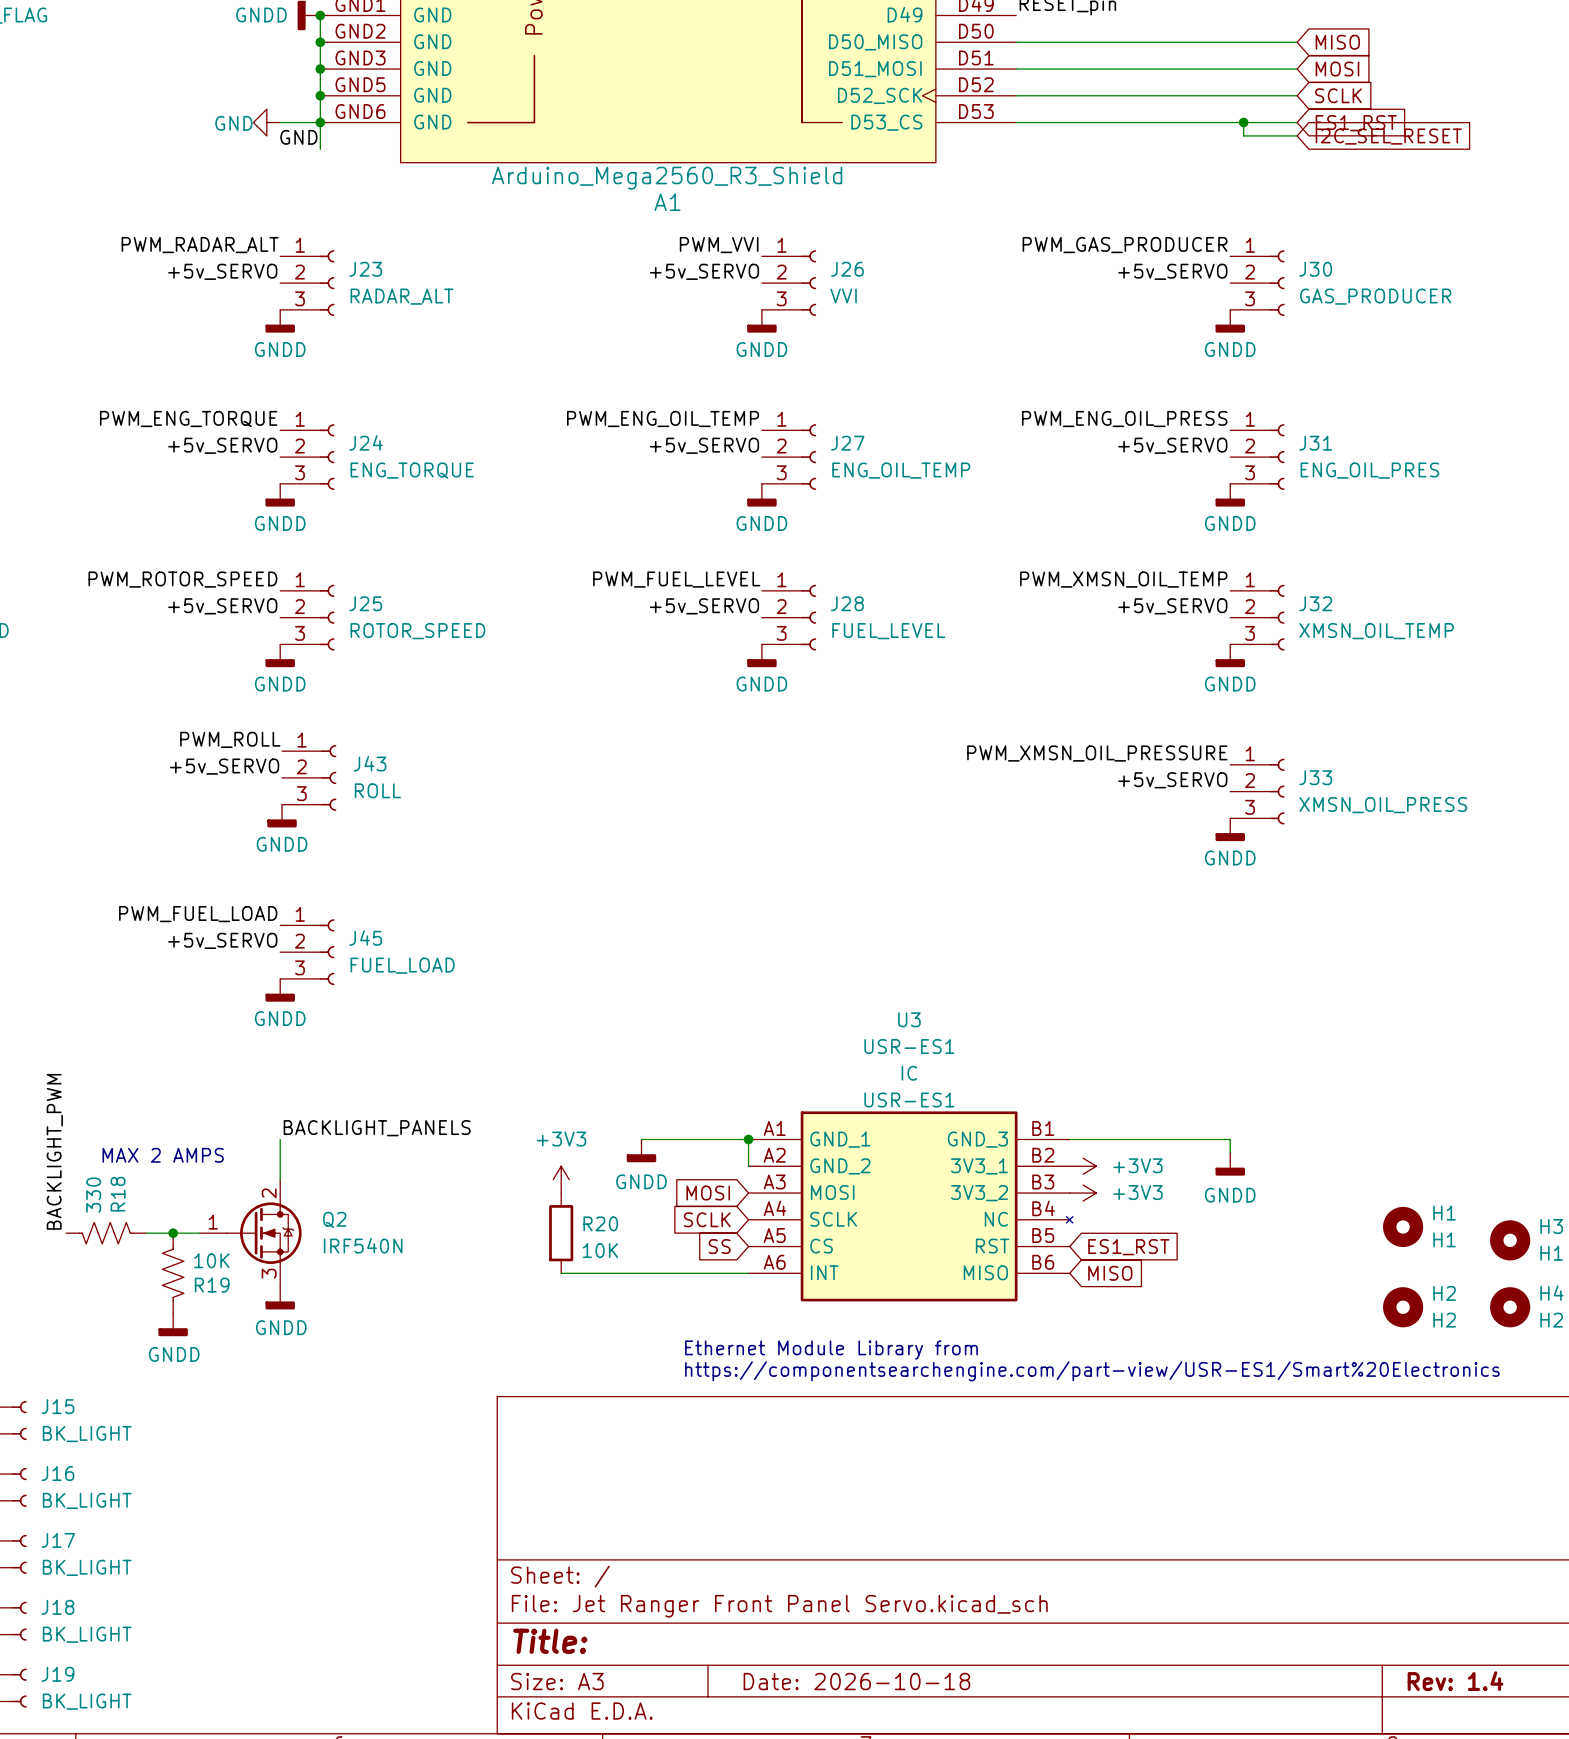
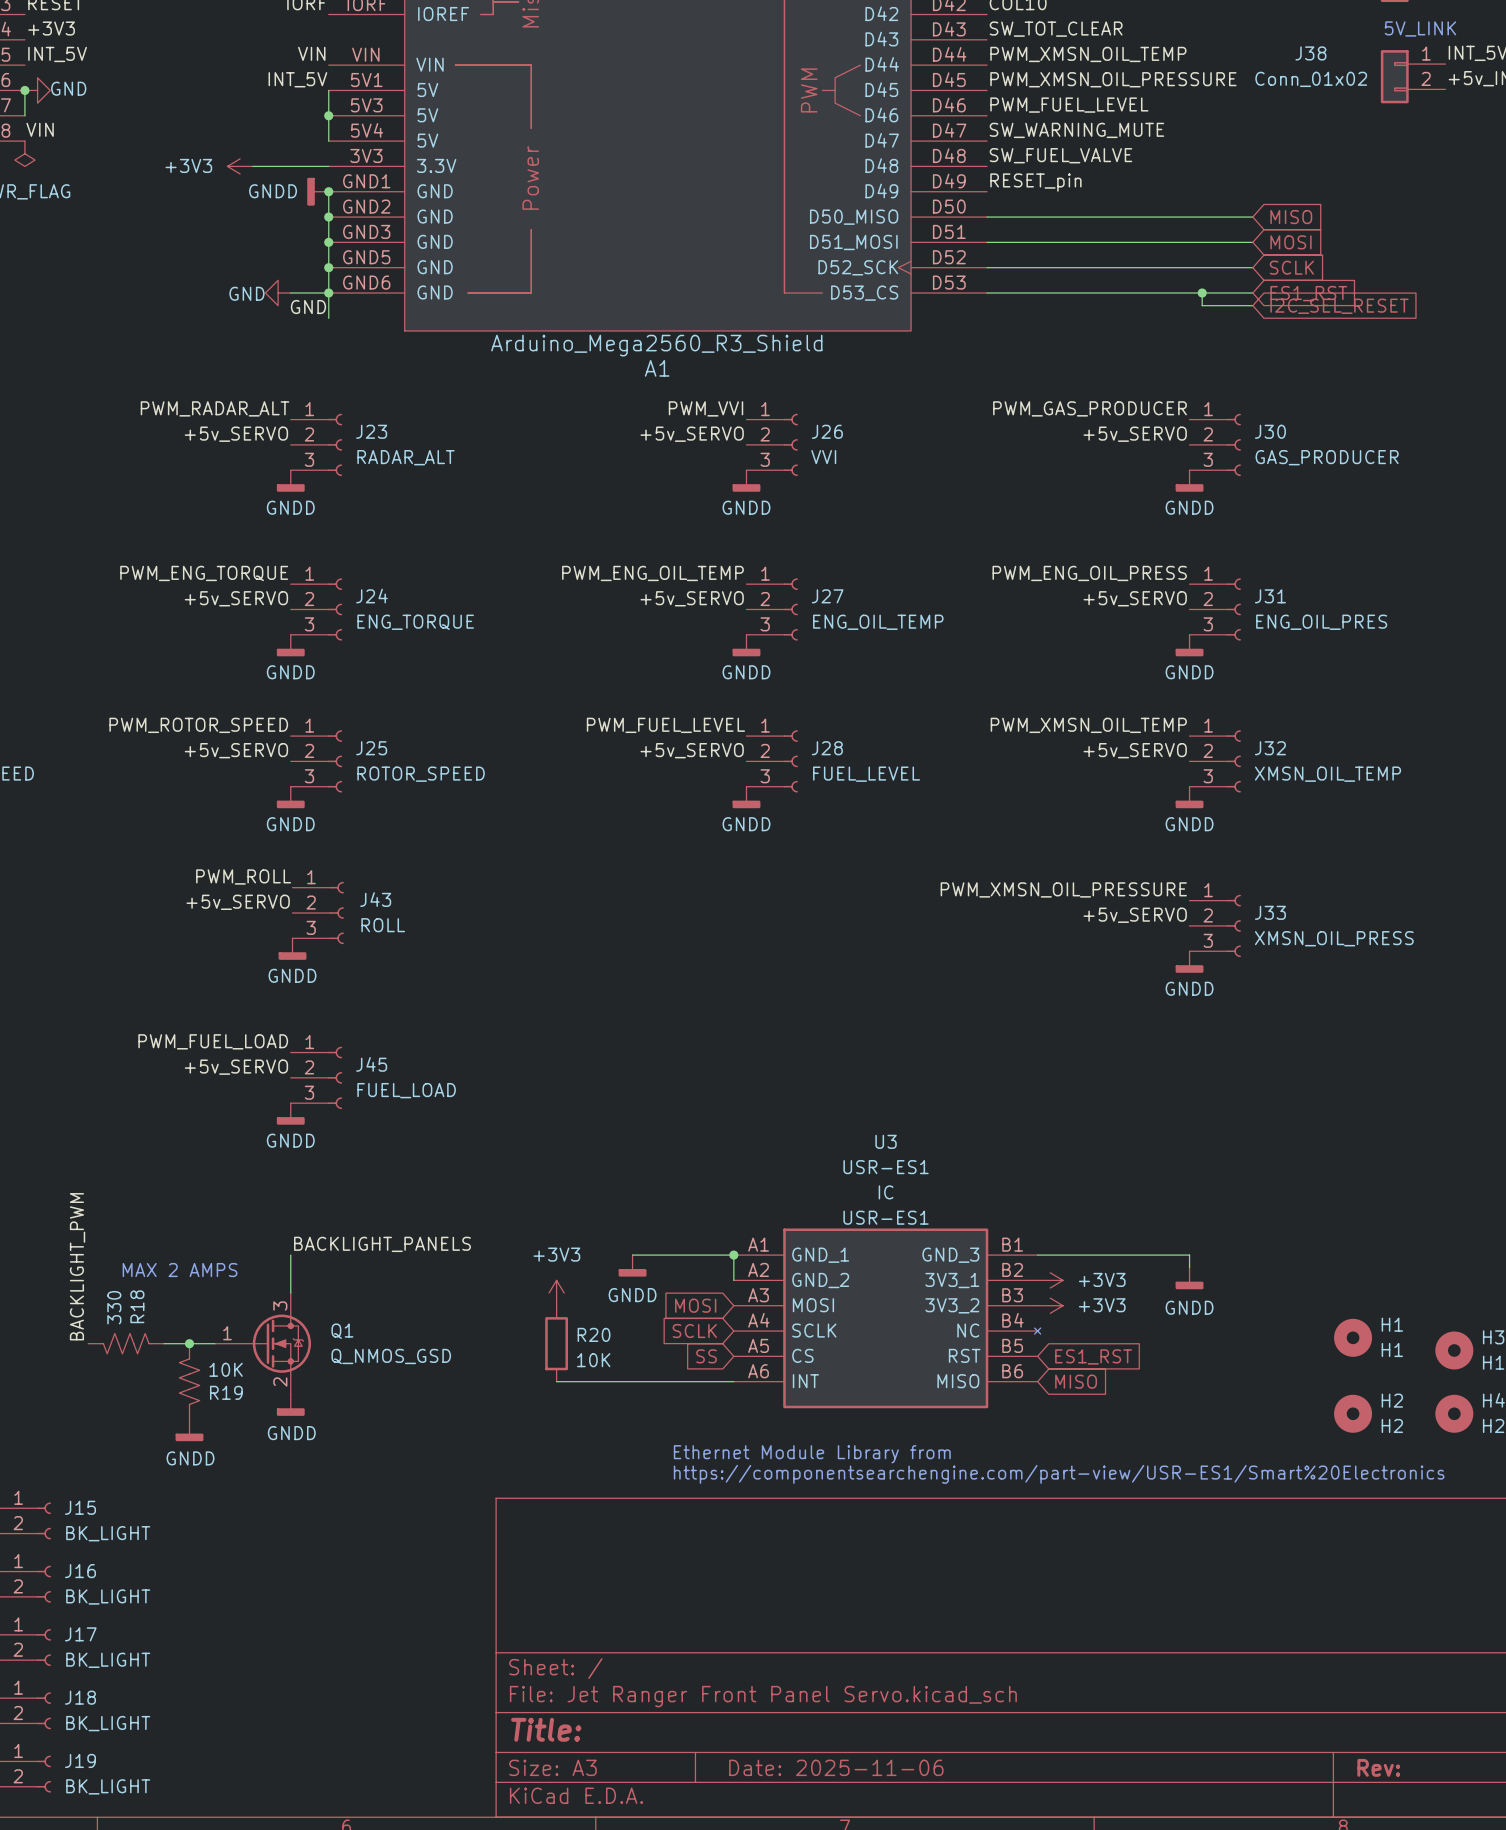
Q2 pin number: 2 (269, 1193) -> 3 (280, 1306)
Q2 name: Q2 (334, 1219) -> Q1 (342, 1331)
Q2 value: IRF540N (363, 1245) -> Q_NMOS_GSD (391, 1356)
Q2 pin number: 3 (269, 1273) -> 2 (280, 1381)
title block: Date: 2026-10-18 (856, 1681) -> Date: 2025-11-06 (836, 1767)
title block: Rev: 1.4 (1455, 1681) -> Rev: (1378, 1767)

